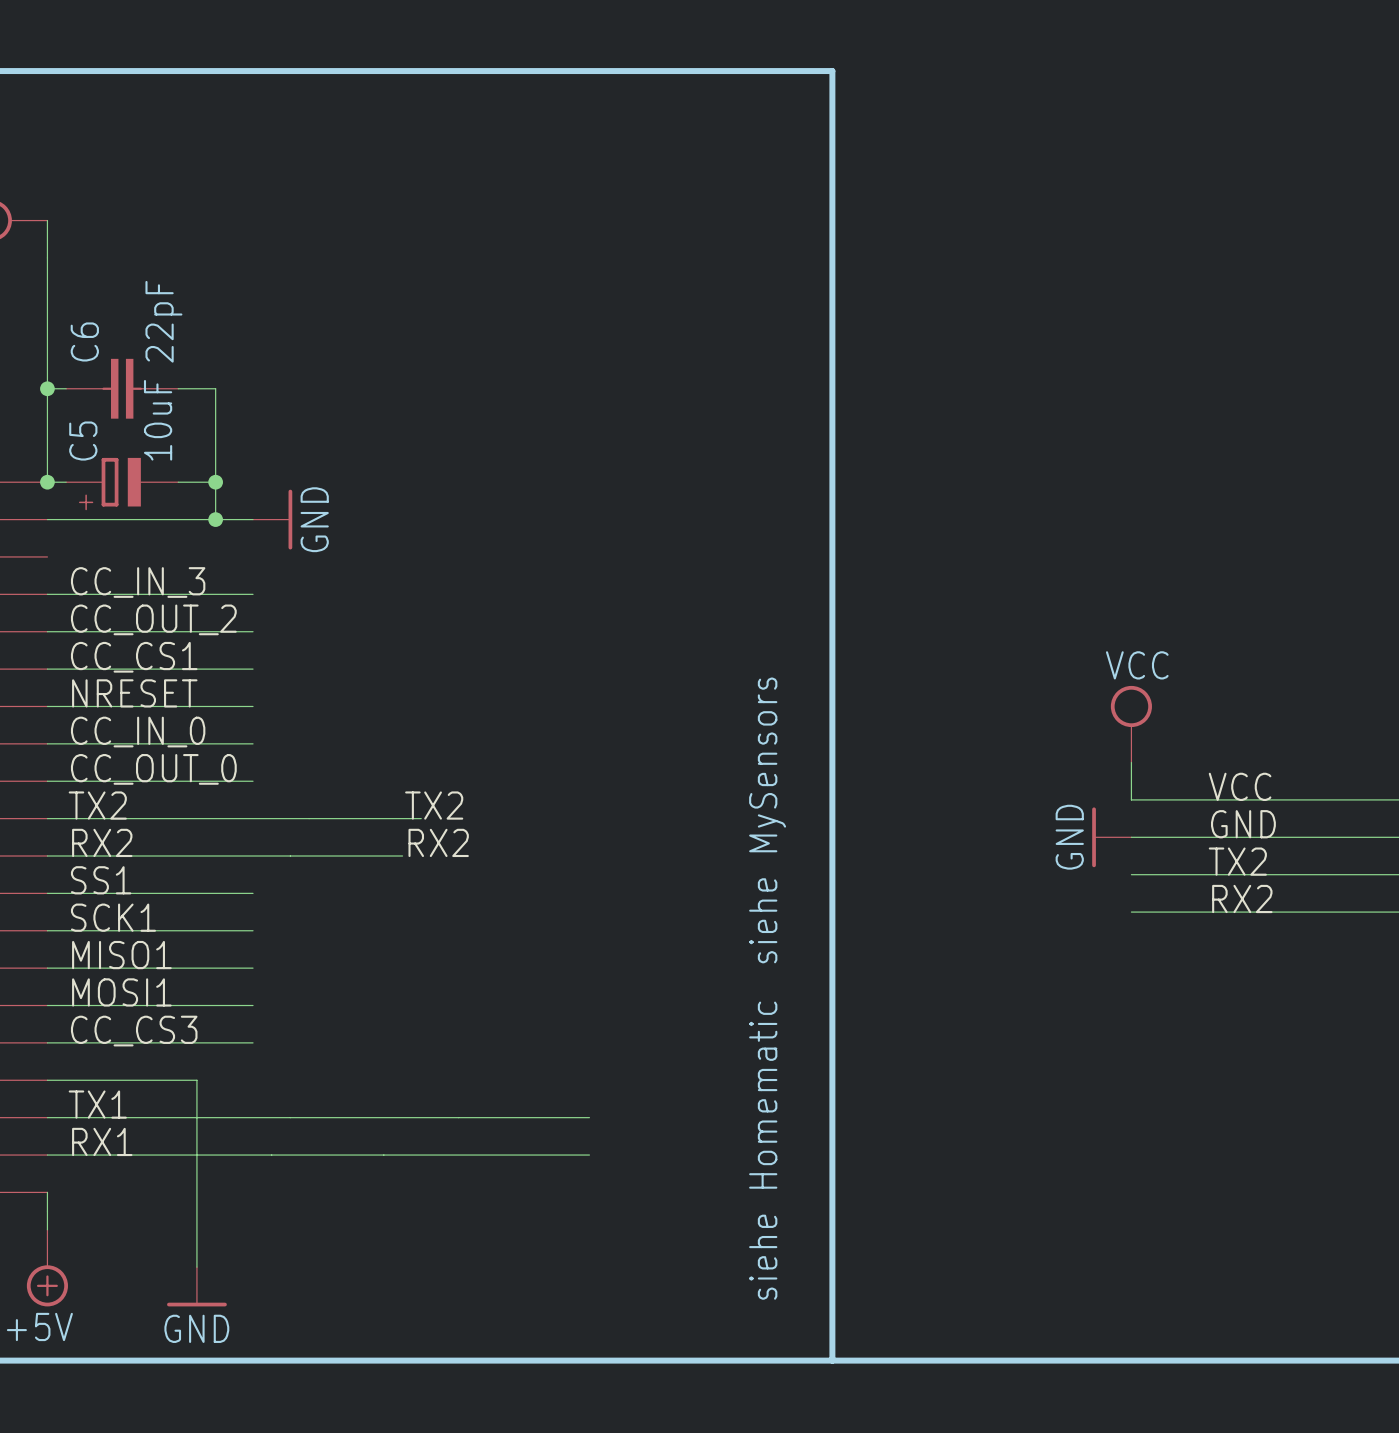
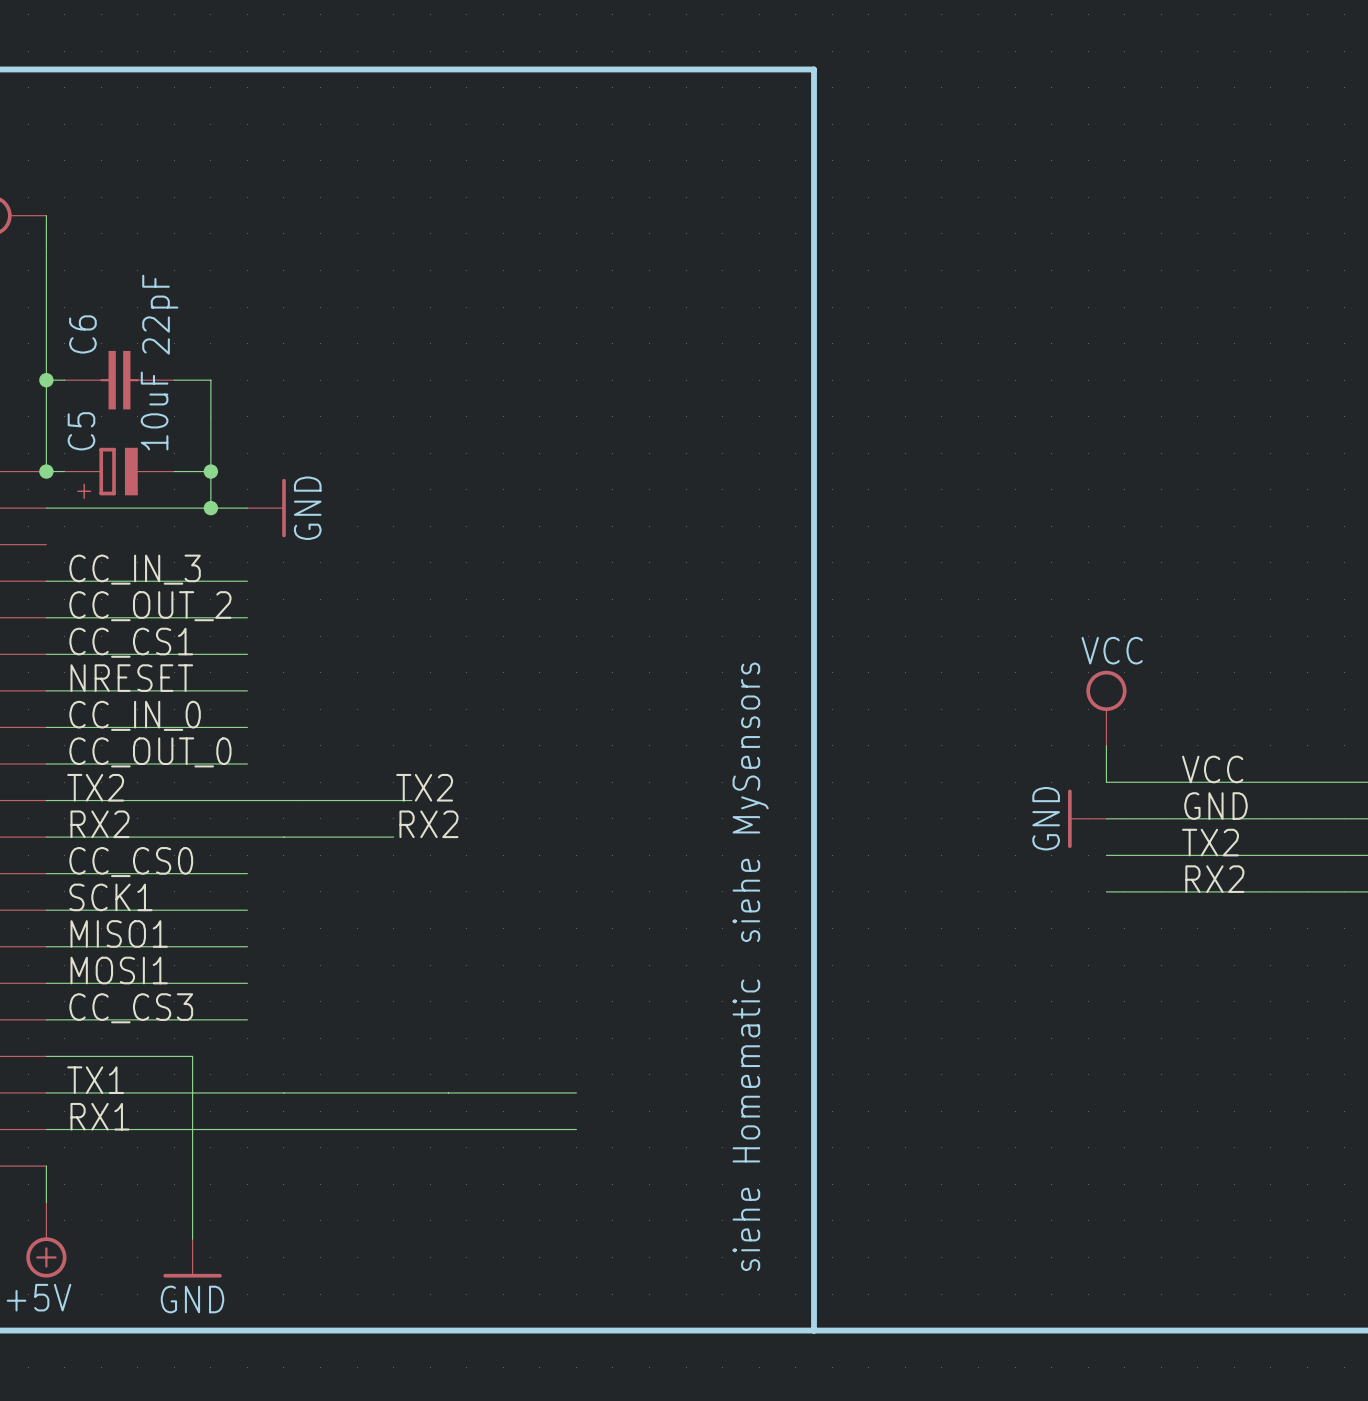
label: SS1 (101, 880) -> CC_CS0 (131, 862)

